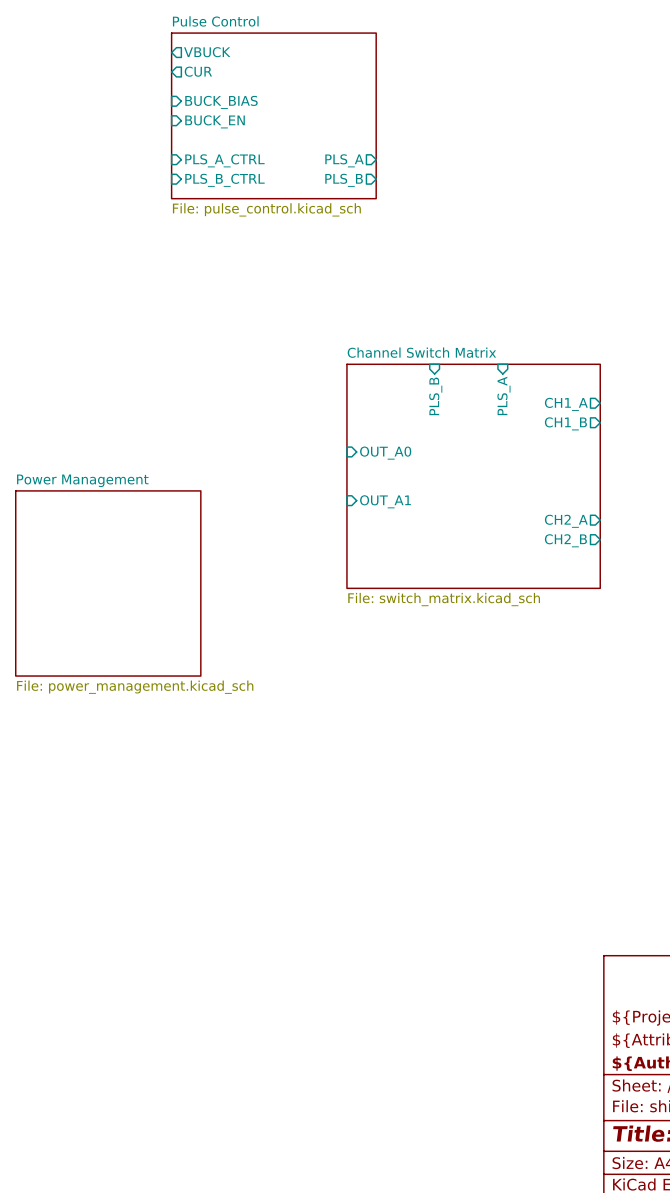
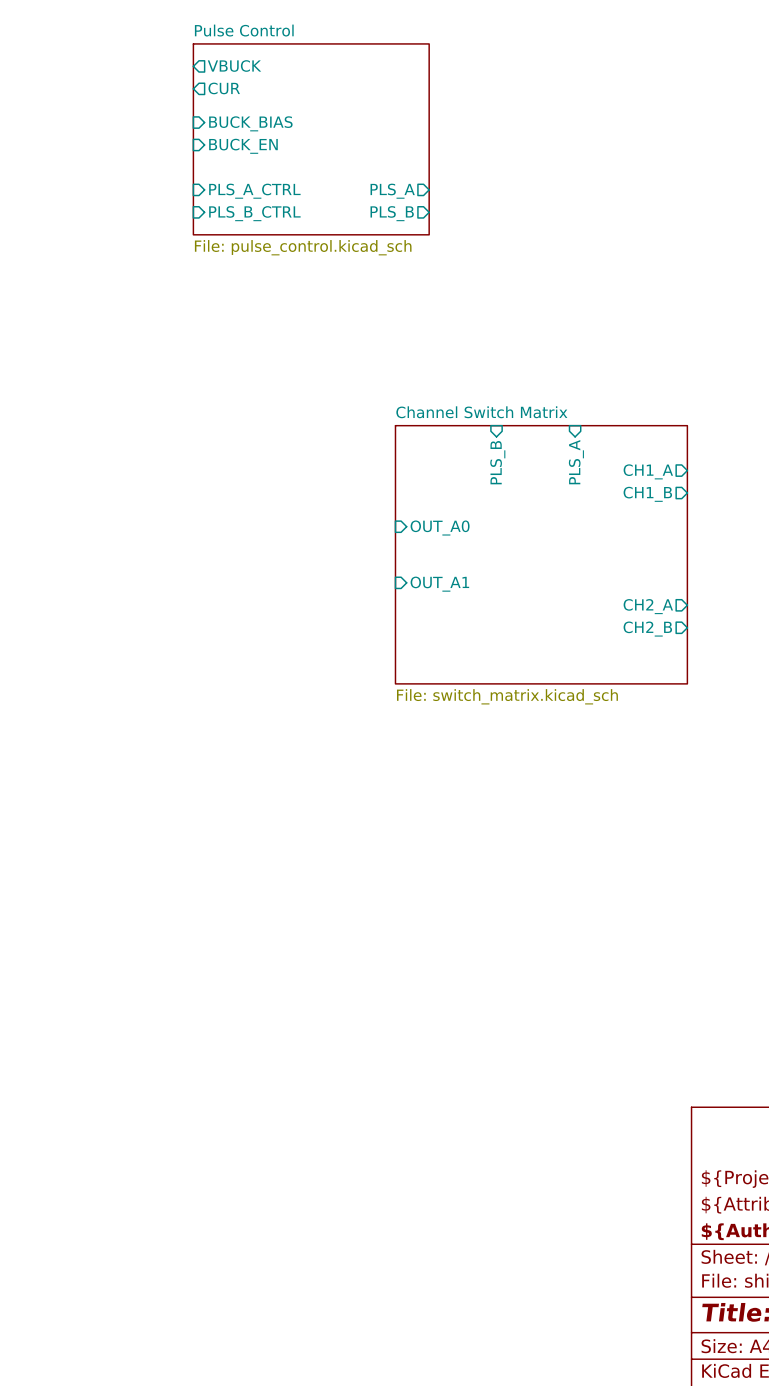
sheet Power Management: File: power_management.kicad_sch (108, 583) -> none

